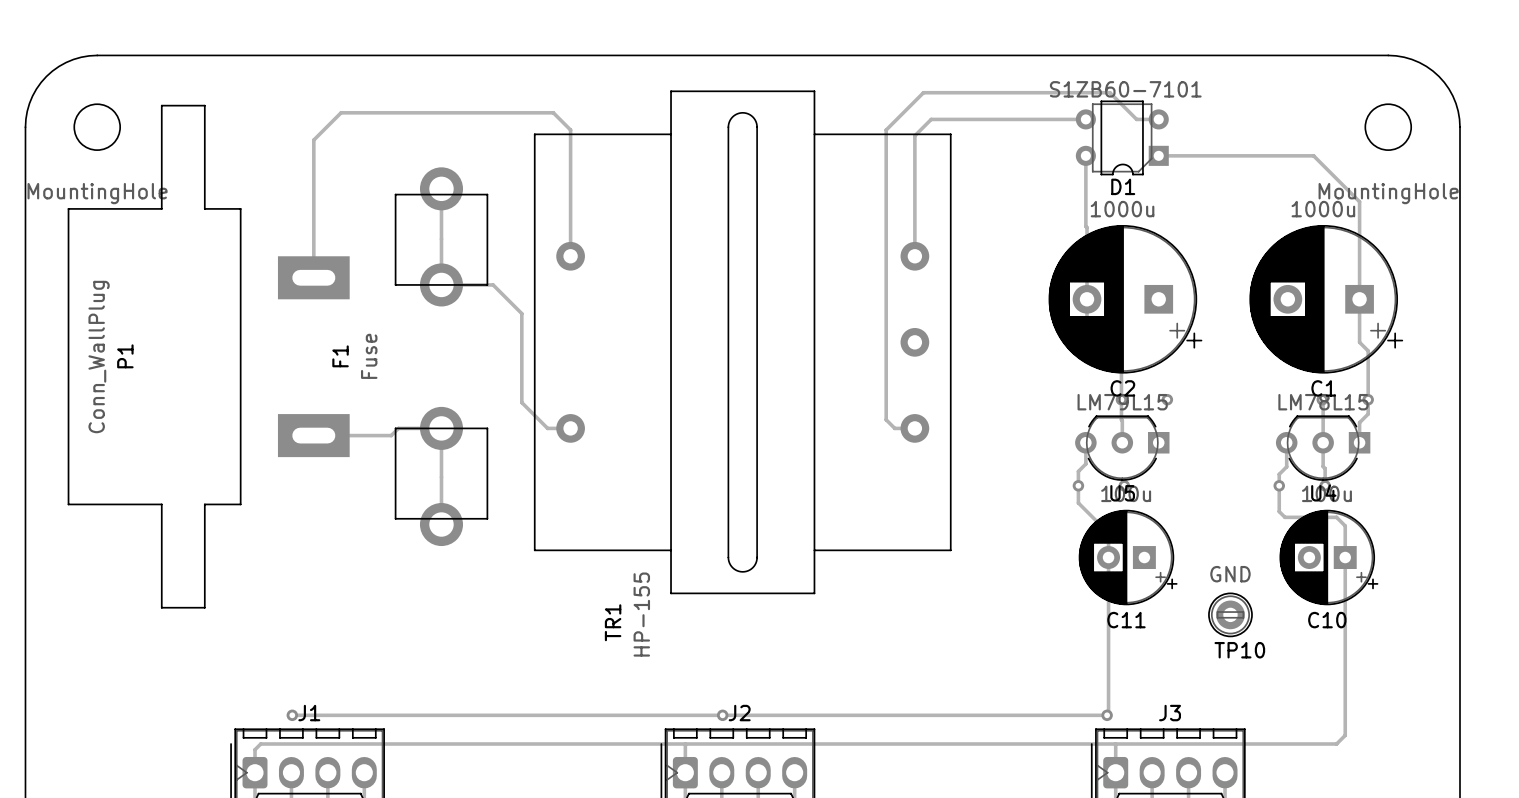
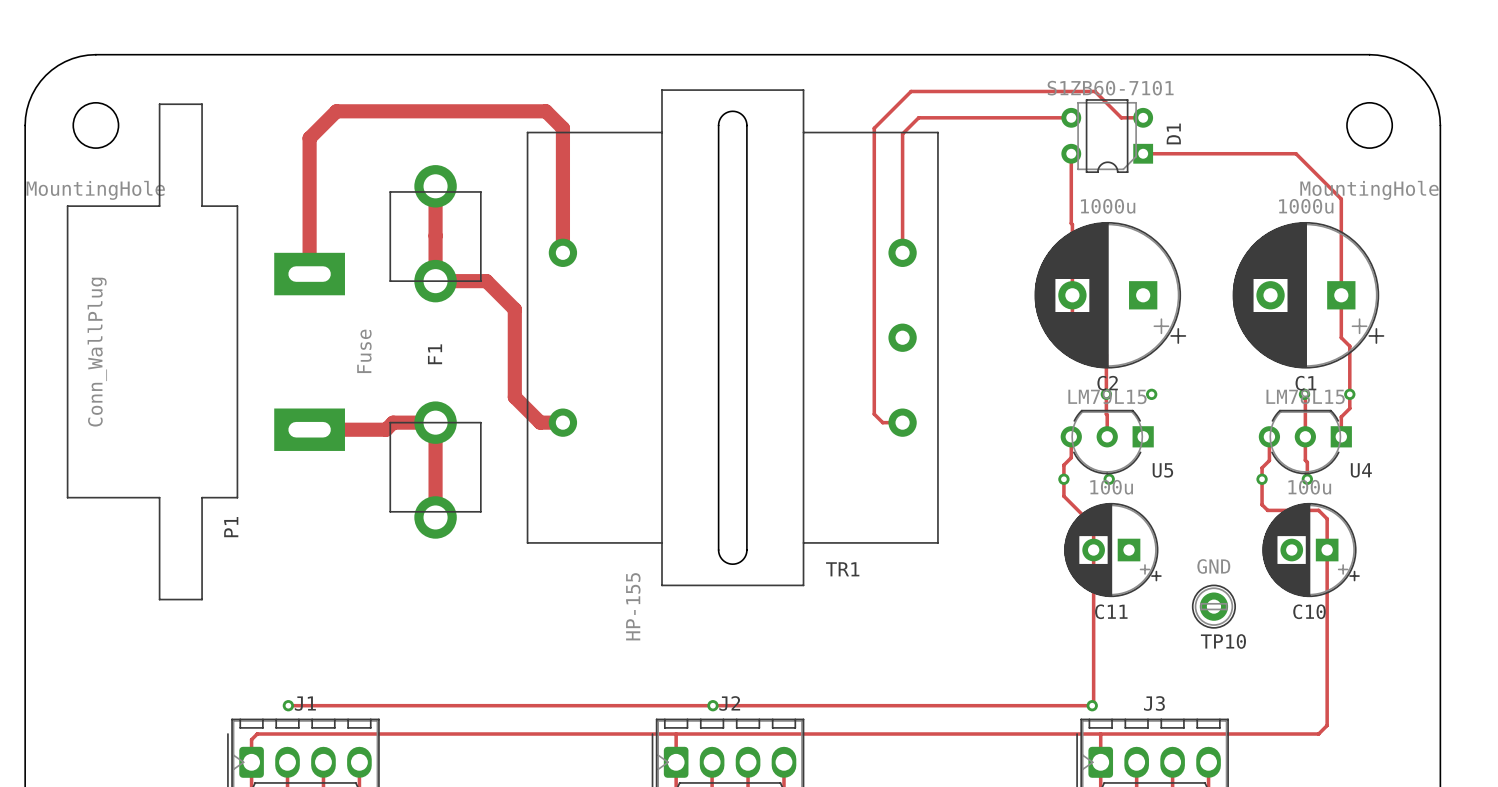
D1 name rotation: 0° (1123, 186) -> 90° counterclockwise (1173, 133)
D1 name position: D1 (1123, 186) -> D1 (1173, 133)
track width: thin (441, 188) (441, 284) (493, 284) (521, 313) (521, 402) (547, 428) (570, 428) -> thick (435, 186) (435, 281) (486, 281) (514, 309) (514, 397) (540, 422) (562, 422)
track width: thin (570, 256) (570, 130) (553, 112) (341, 112) (313, 140) (313, 277) -> thick (562, 252) (562, 128) (545, 111) (336, 111) (309, 138) (309, 274)
P1 name position: P1 (125, 356) -> P1 (231, 527)
F1 name position: F1 (340, 356) -> F1 (435, 354)
track width: thin (313, 435) (391, 435) (398, 428) (441, 428) (441, 524) -> thick (309, 429) (386, 429) (393, 422) (435, 422) (435, 517)
U4 name position: U4 (1323, 492) -> U4 (1361, 470)
U5 name position: U5 (1122, 493) -> U5 (1162, 470)
TR1 name rotation: 0° (613, 622) -> 90° clockwise (842, 569)
TR1 name position: TR1 (613, 622) -> TR1 (842, 569)

